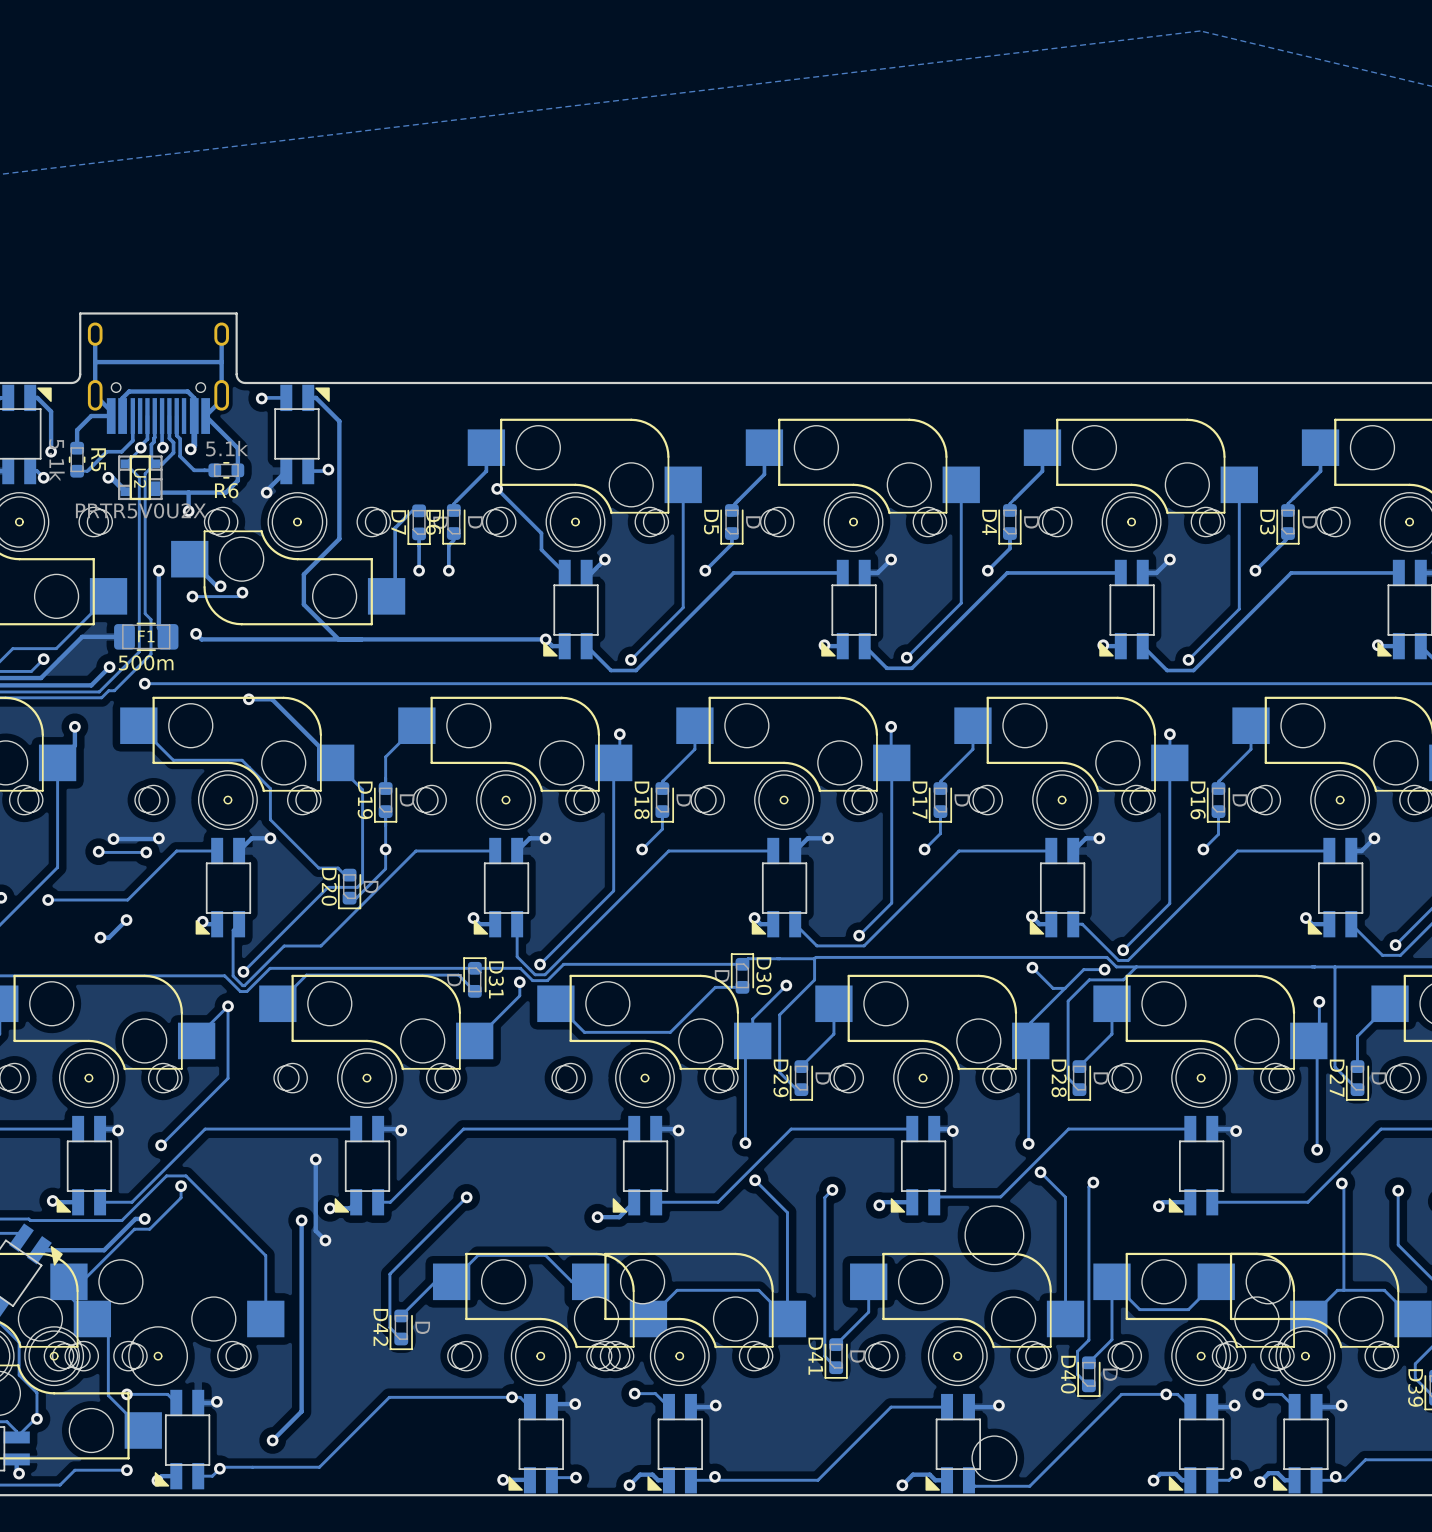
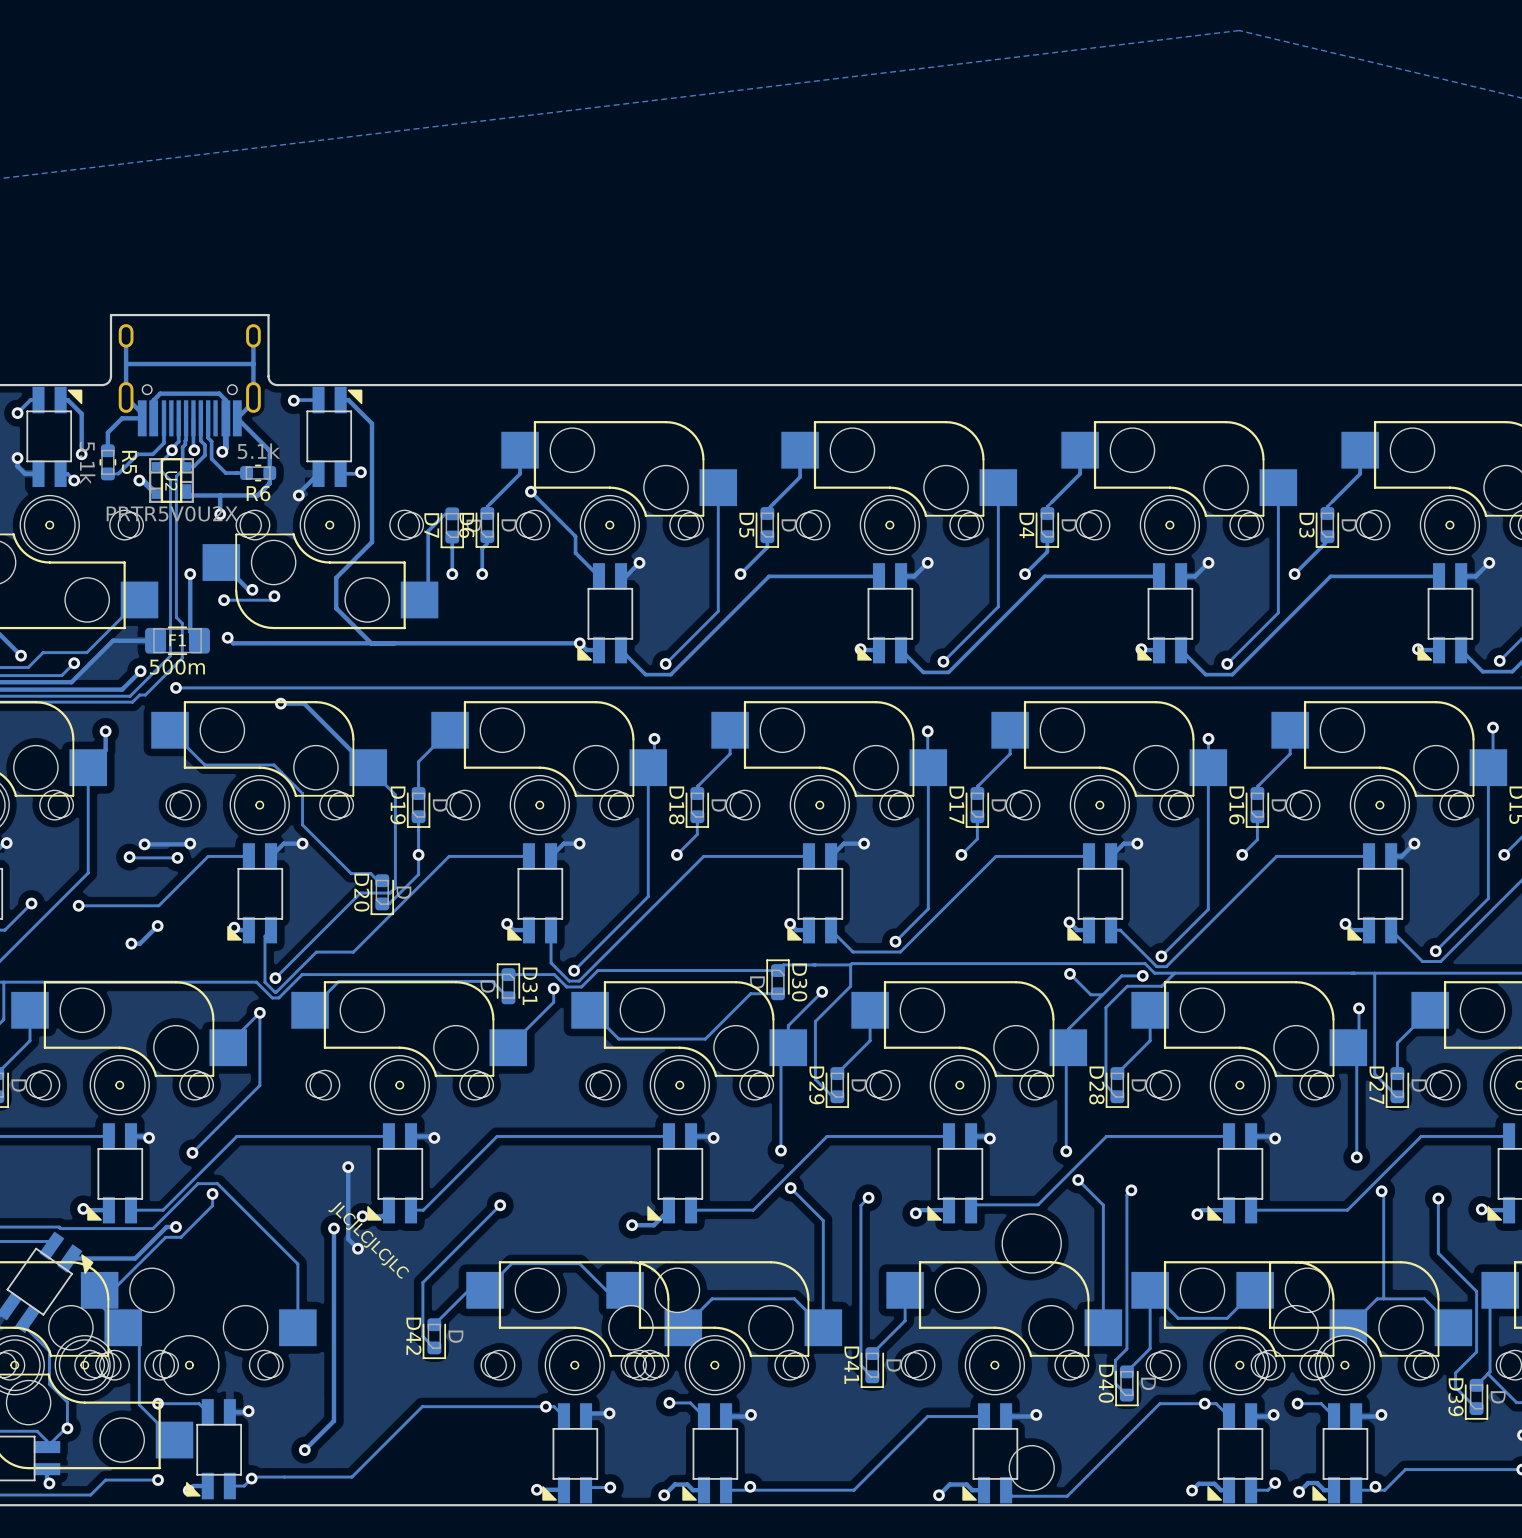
text: none -> JLCJLCJLCJLC (368, 1240)

